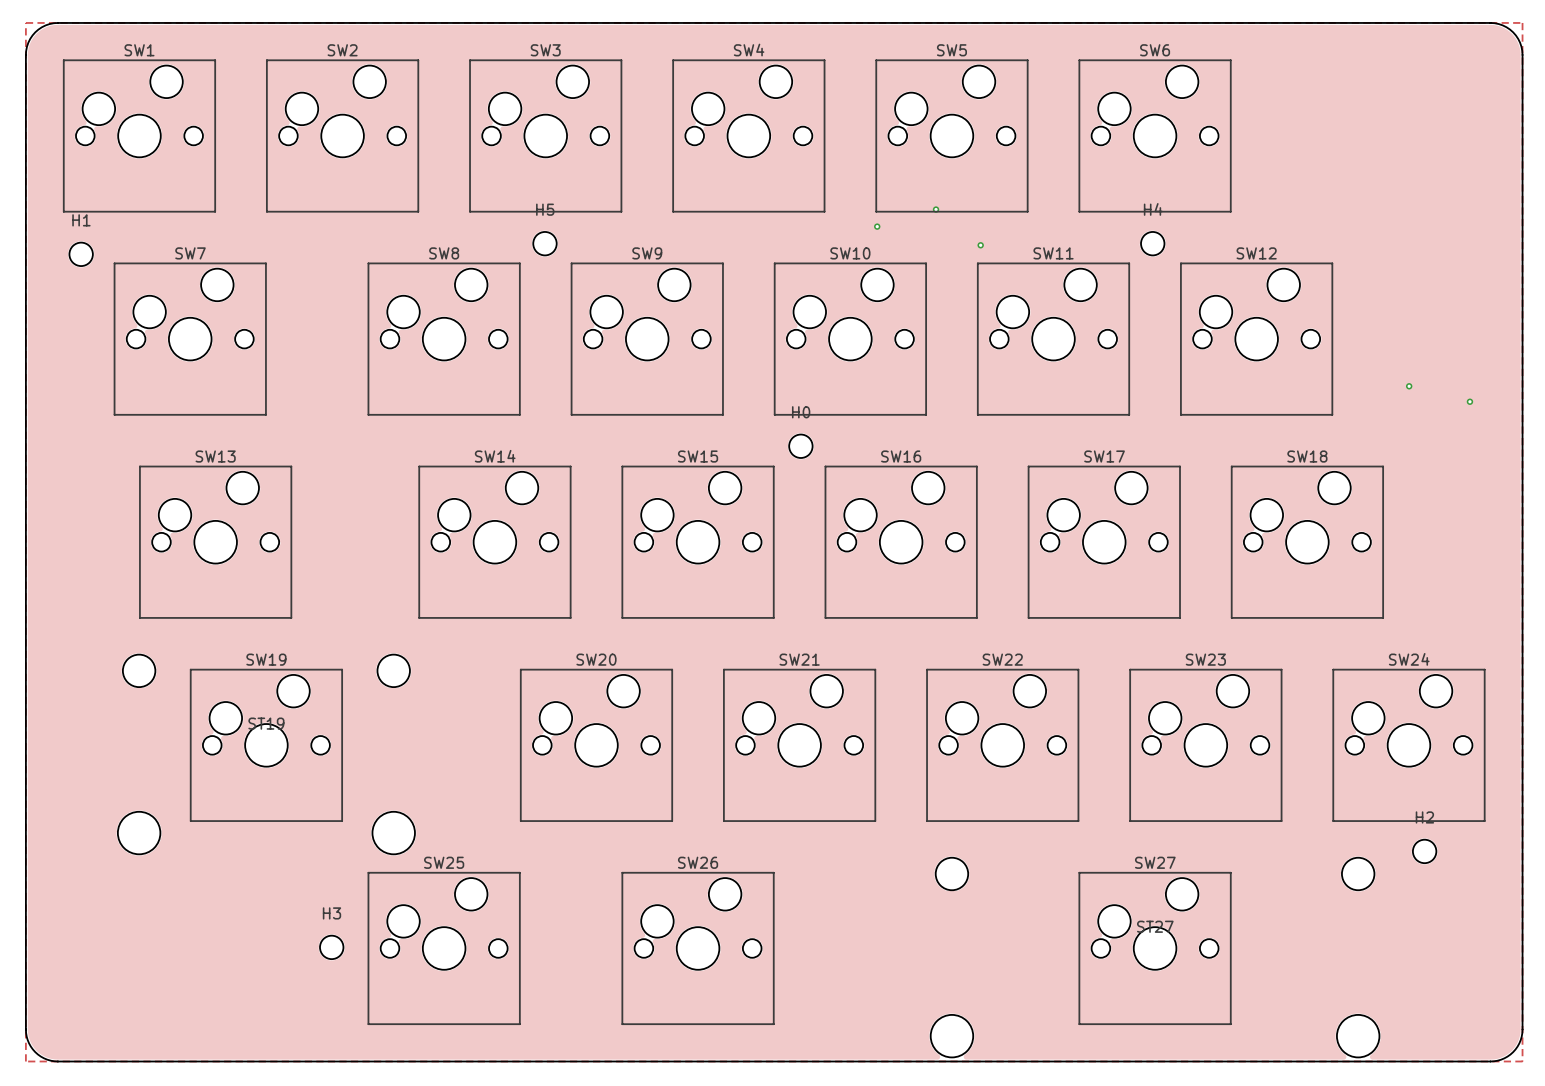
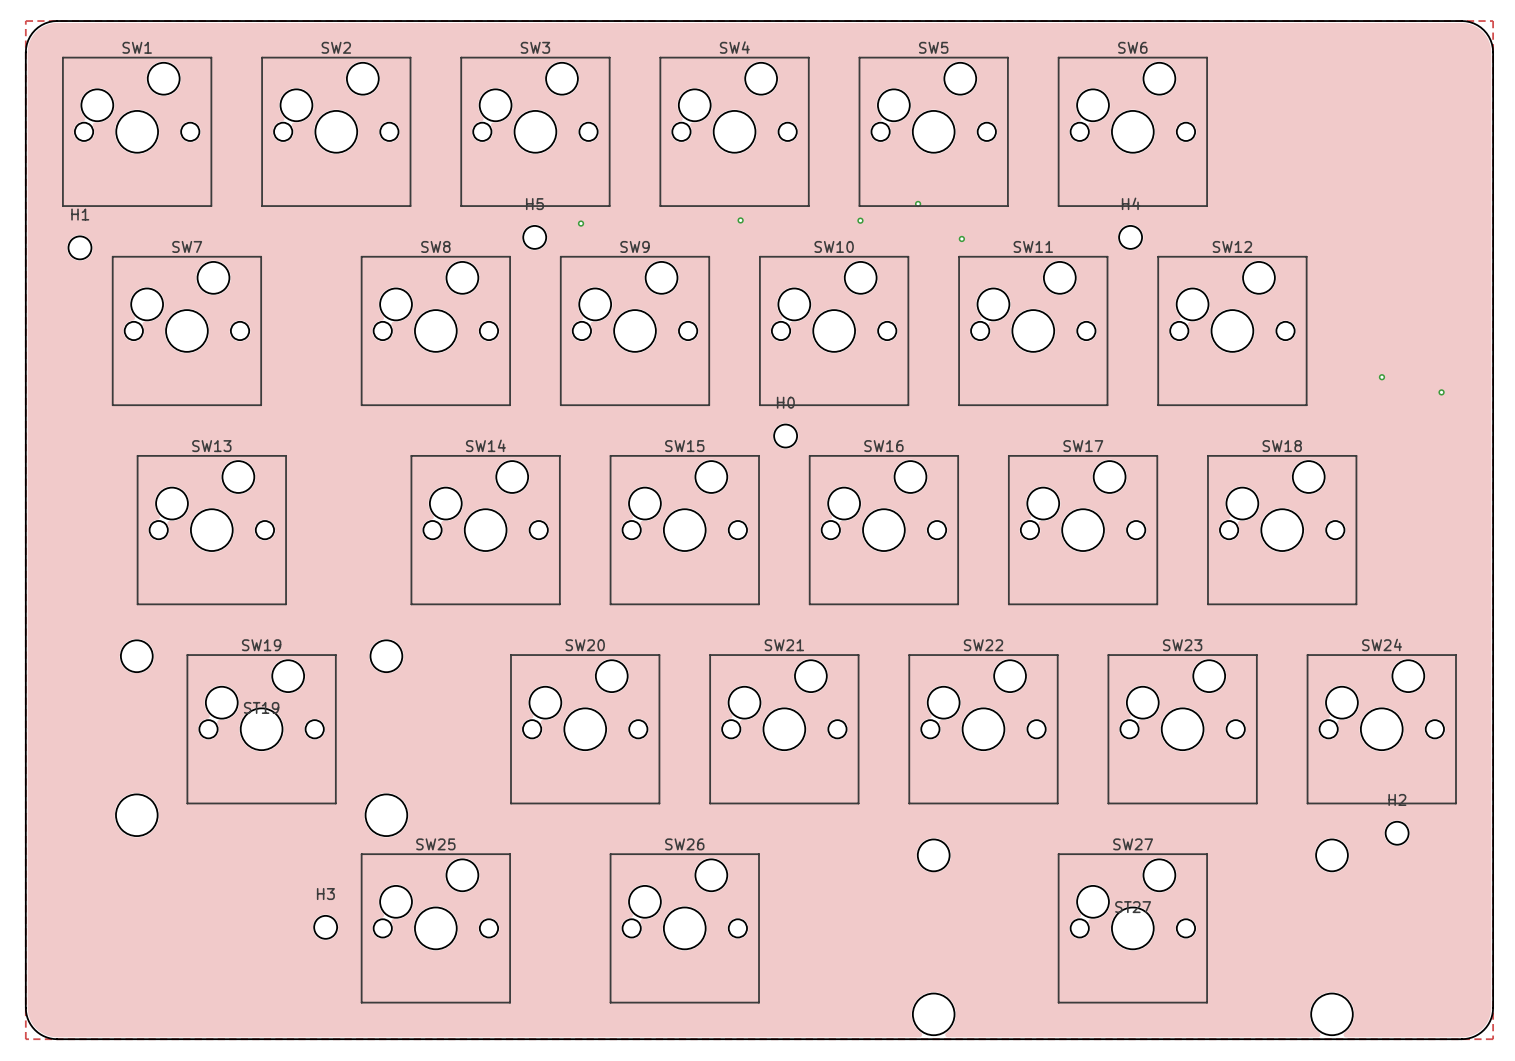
via: none -> (740, 220)
via: none -> (581, 223)

